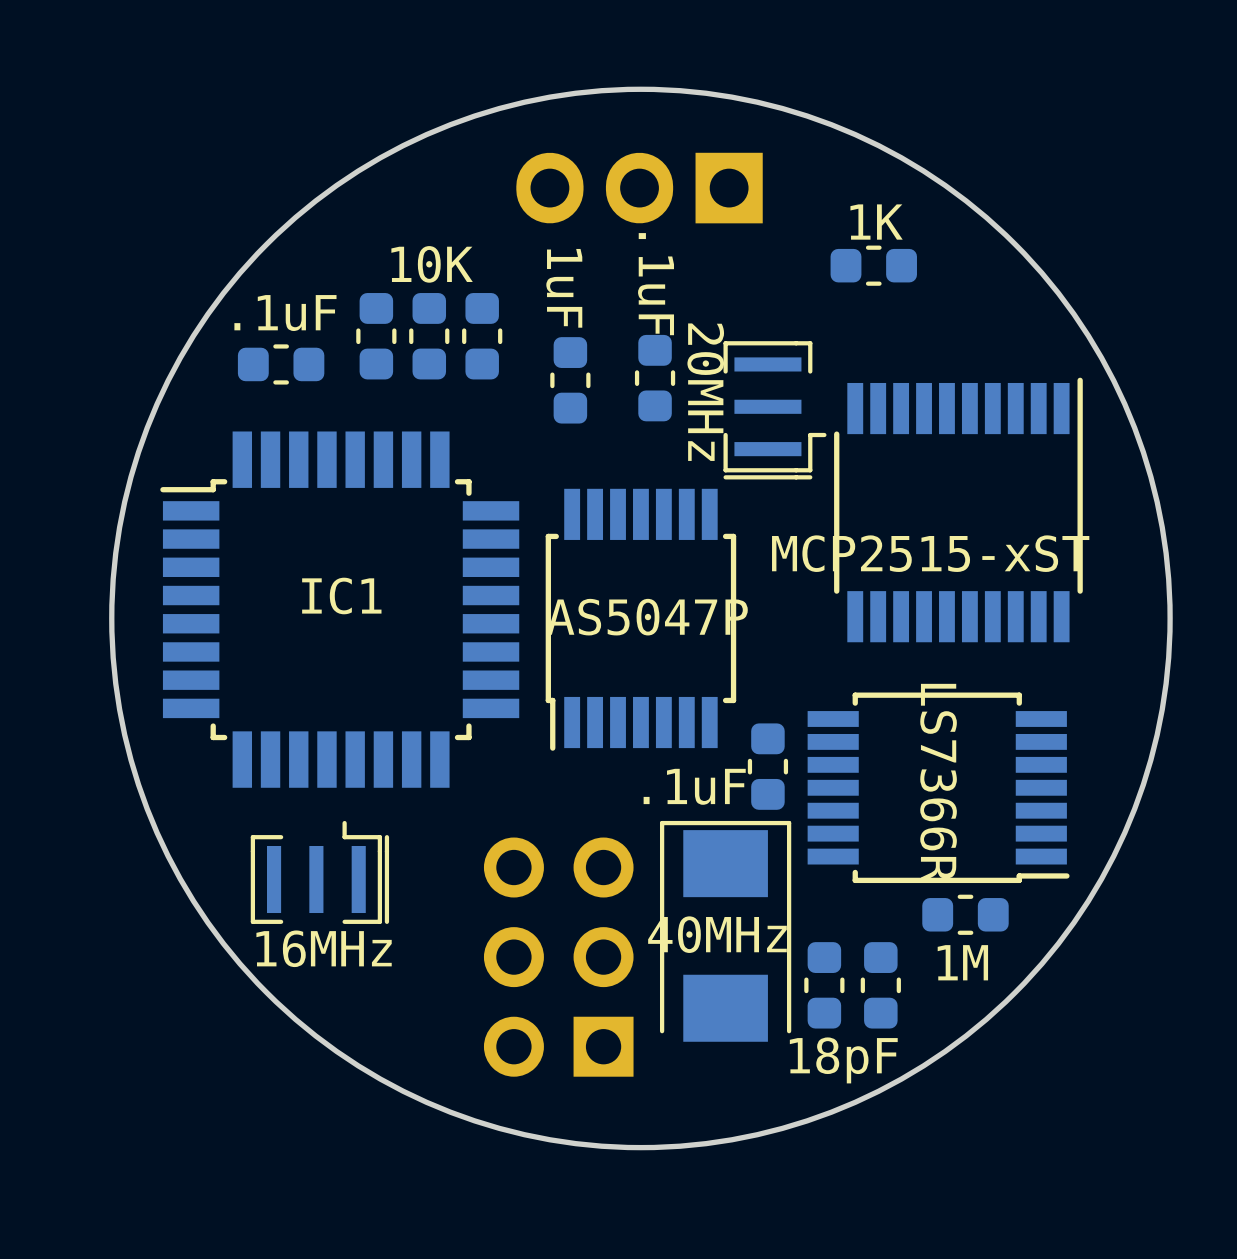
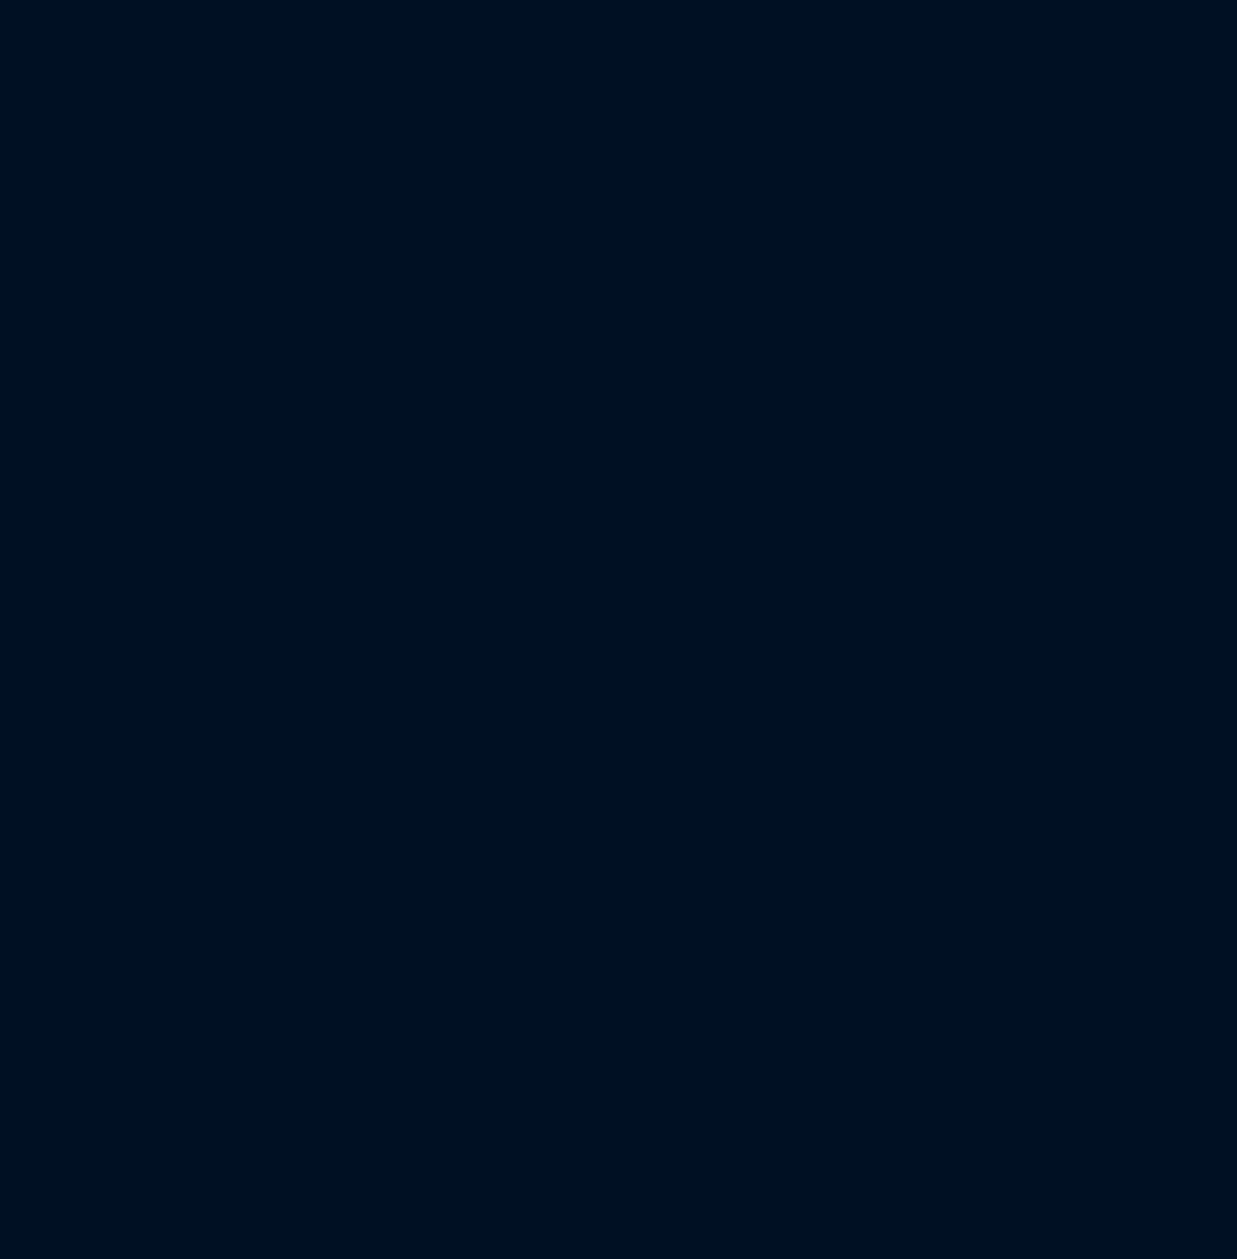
round board edge: [109, 86, 1173, 1151] -> none
part: (639, 188) -> none
part: 1K (873, 265) -> none
part: (376, 336) -> none
part: 10K (429, 336) -> none
part: (482, 336) -> none
part: .1uF (281, 364) -> none
part: .1uF (655, 378) -> none
part: 1uF (570, 380) -> none
part: 20MHz (774, 410) -> none
part: MCP2515-xST (958, 509) -> none
IC1: (339, 609) -> none
part: AS5047P (640, 619) -> none
part: .1uF (767, 766) -> none
part: LS7366R (938, 787) -> none
part: 16MHz (319, 872) -> none
part: 1M (965, 914) -> none
part: 40MHz (725, 931) -> none
part: (558, 957) -> none
part: 18pF (824, 985) -> none
part: (880, 985) -> none

